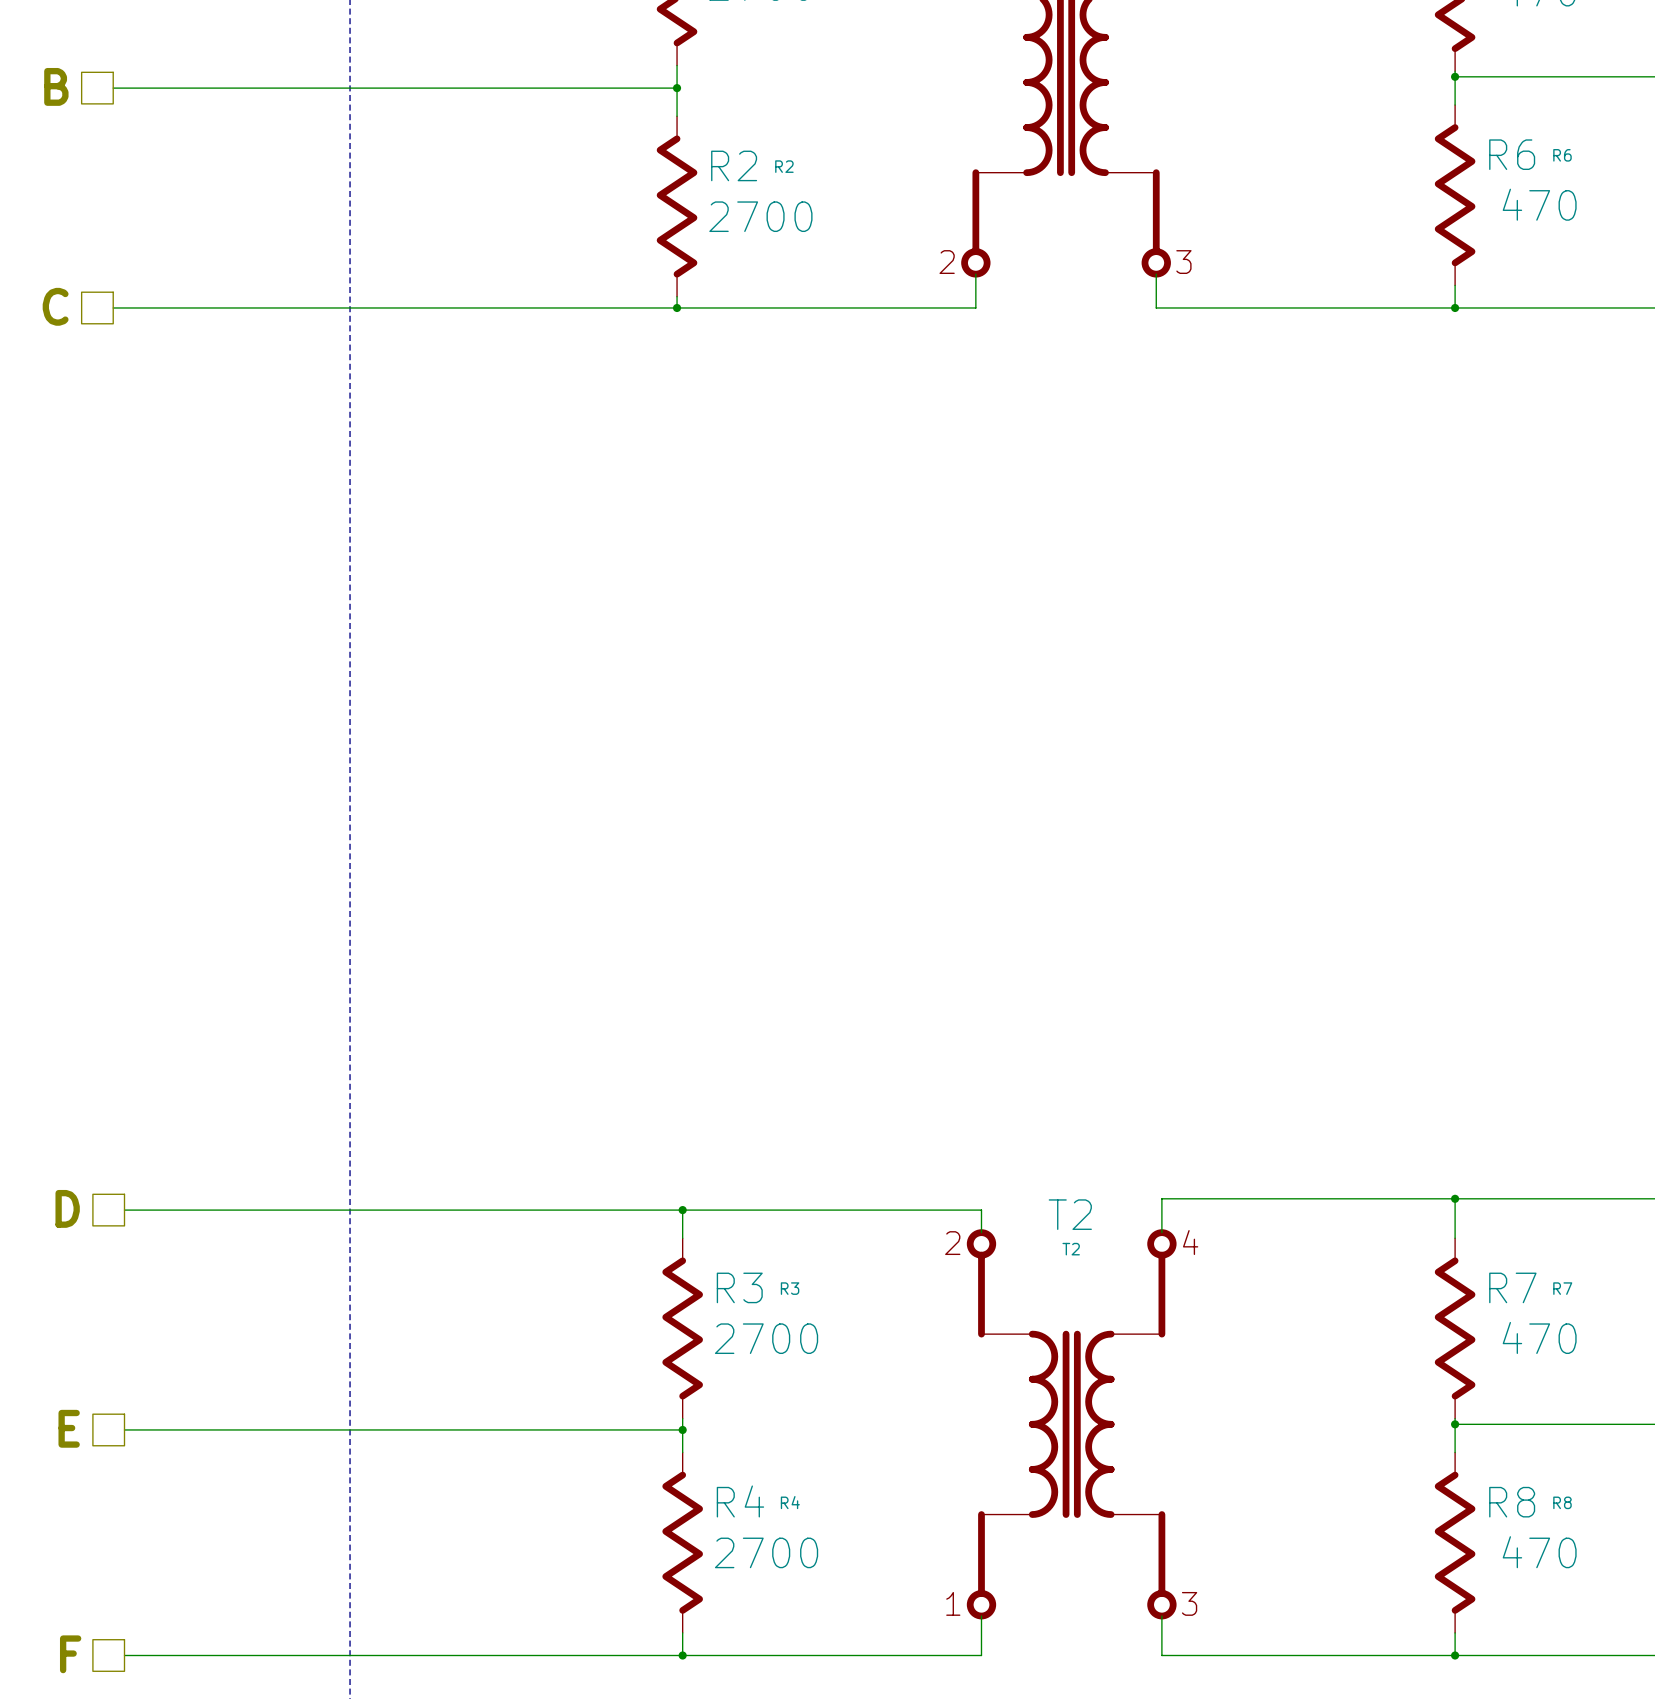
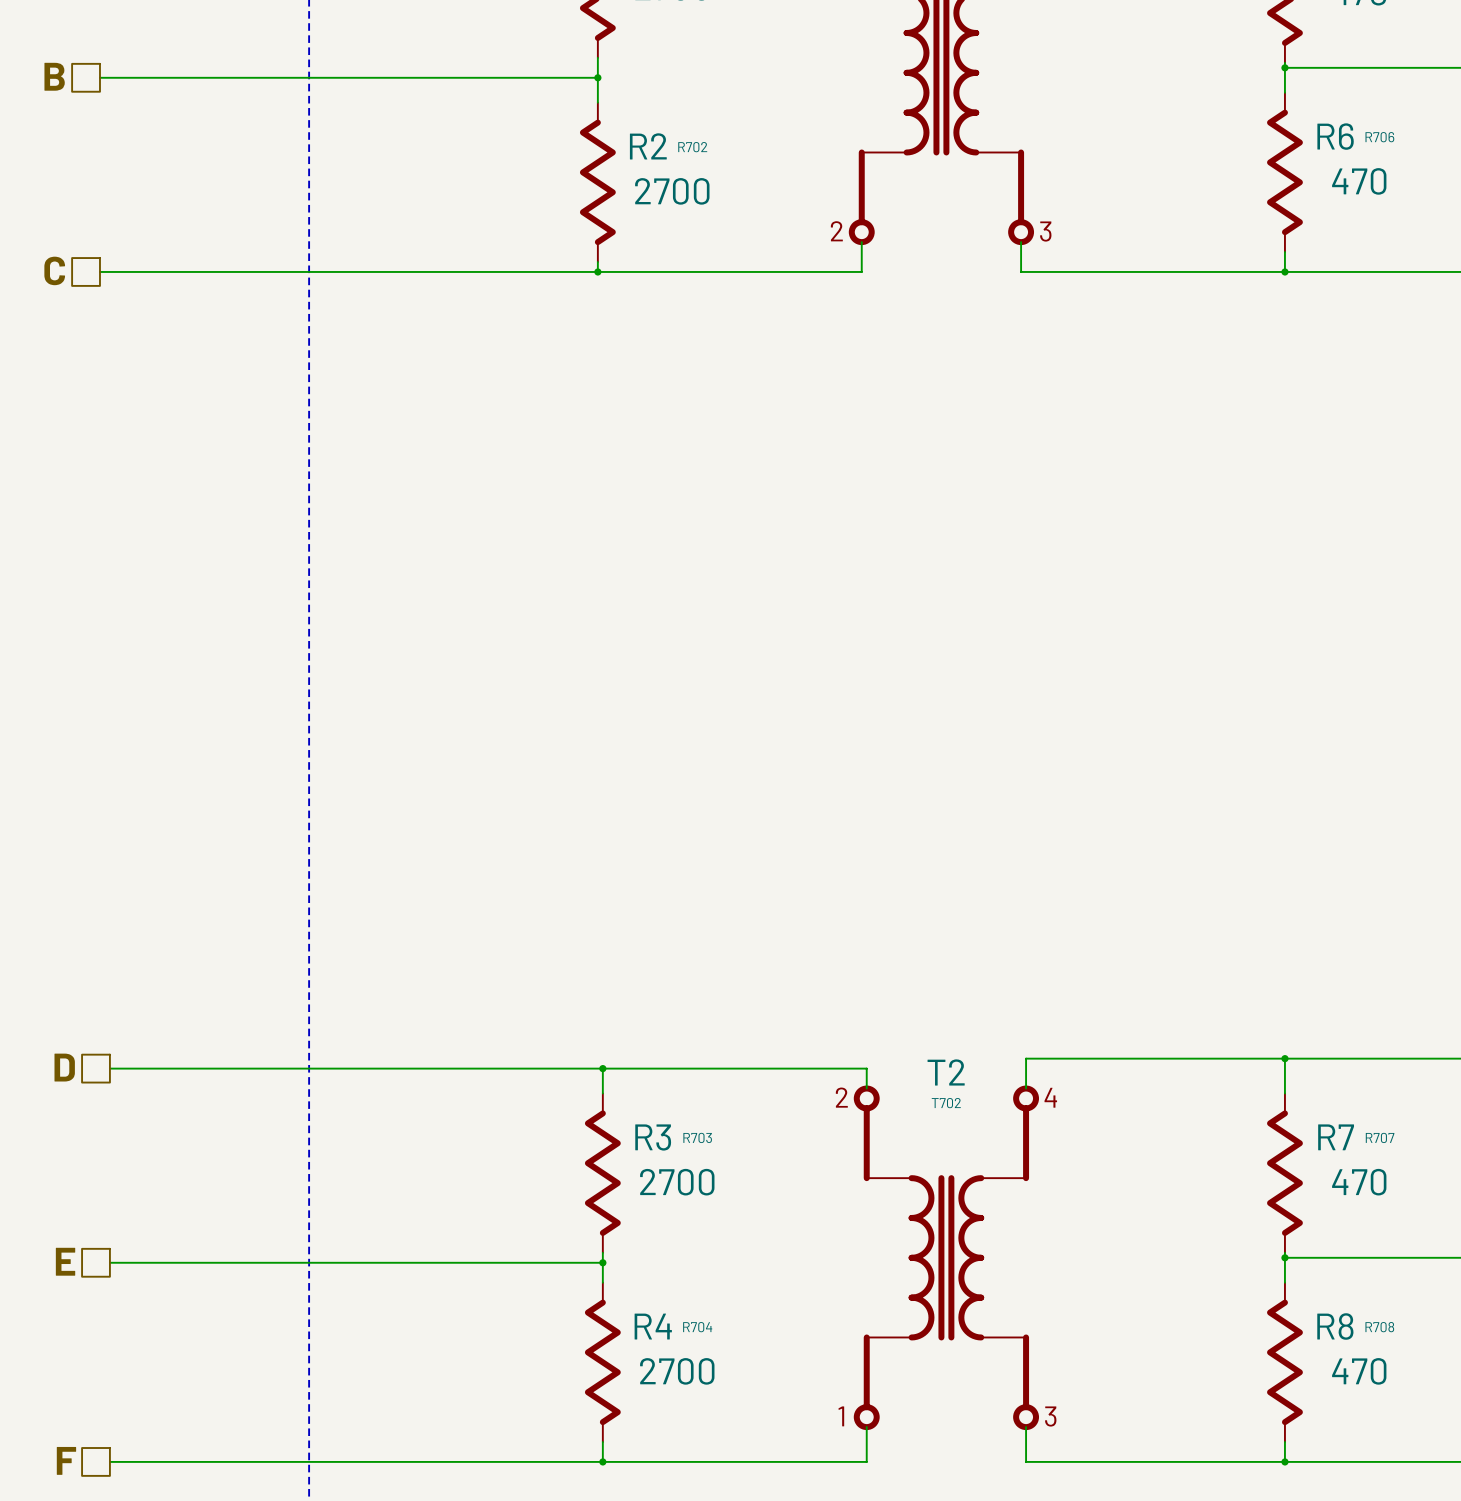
R6 name: R6 (1562, 155) -> R706 (1379, 137)
R2 name: R2 (784, 166) -> R702 (692, 147)
T2 name: T2 (1071, 1249) -> T702 (946, 1103)
R3 name: R3 (790, 1288) -> R703 (697, 1137)
R7 name: R7 (1562, 1288) -> R707 (1380, 1137)
R4 name: R4 (790, 1502) -> R704 (697, 1327)
R8 name: R8 (1562, 1502) -> R708 (1379, 1327)

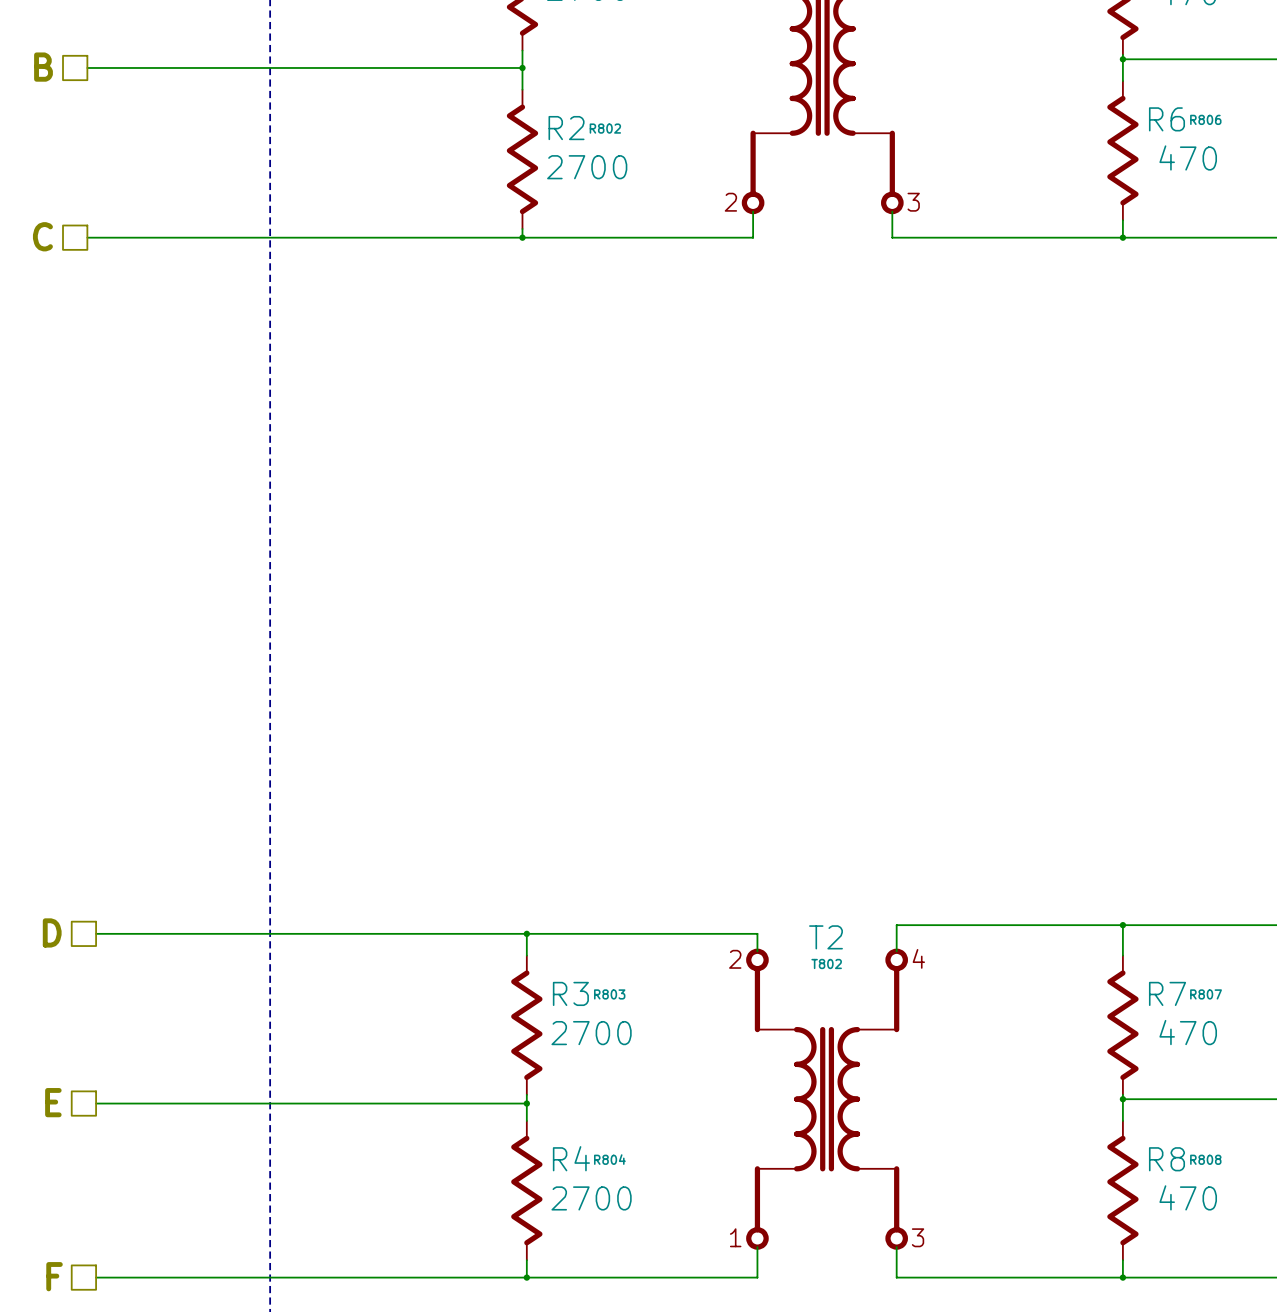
R706 name: R706 (1379, 137) -> R806 (1205, 119)
R702 name: R702 (692, 147) -> R802 (605, 128)
T702 name: T702 (946, 1103) -> T802 (826, 963)
R703 name: R703 (697, 1137) -> R803 (609, 994)
R707 name: R707 (1380, 1137) -> R807 (1206, 994)
R704 name: R704 (697, 1327) -> R804 (609, 1159)
R708 name: R708 (1379, 1327) -> R808 (1205, 1159)

